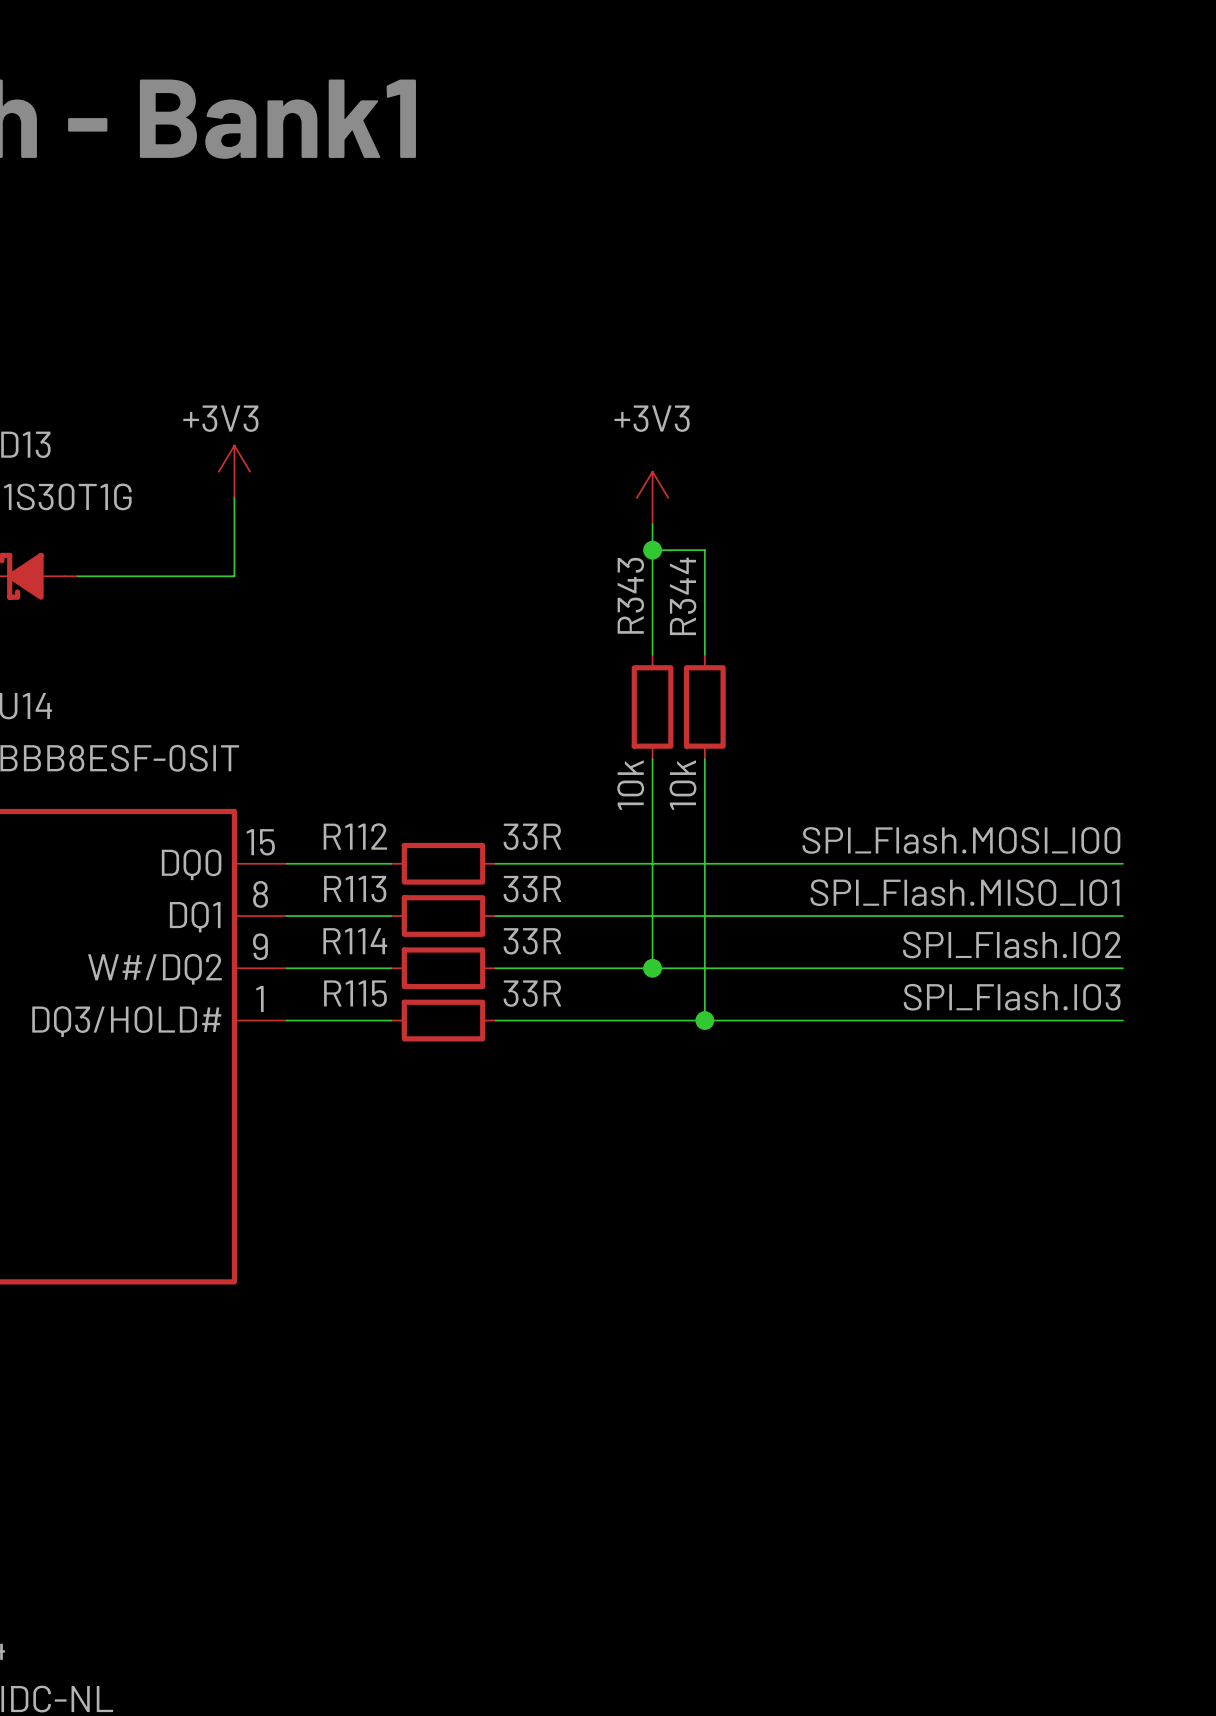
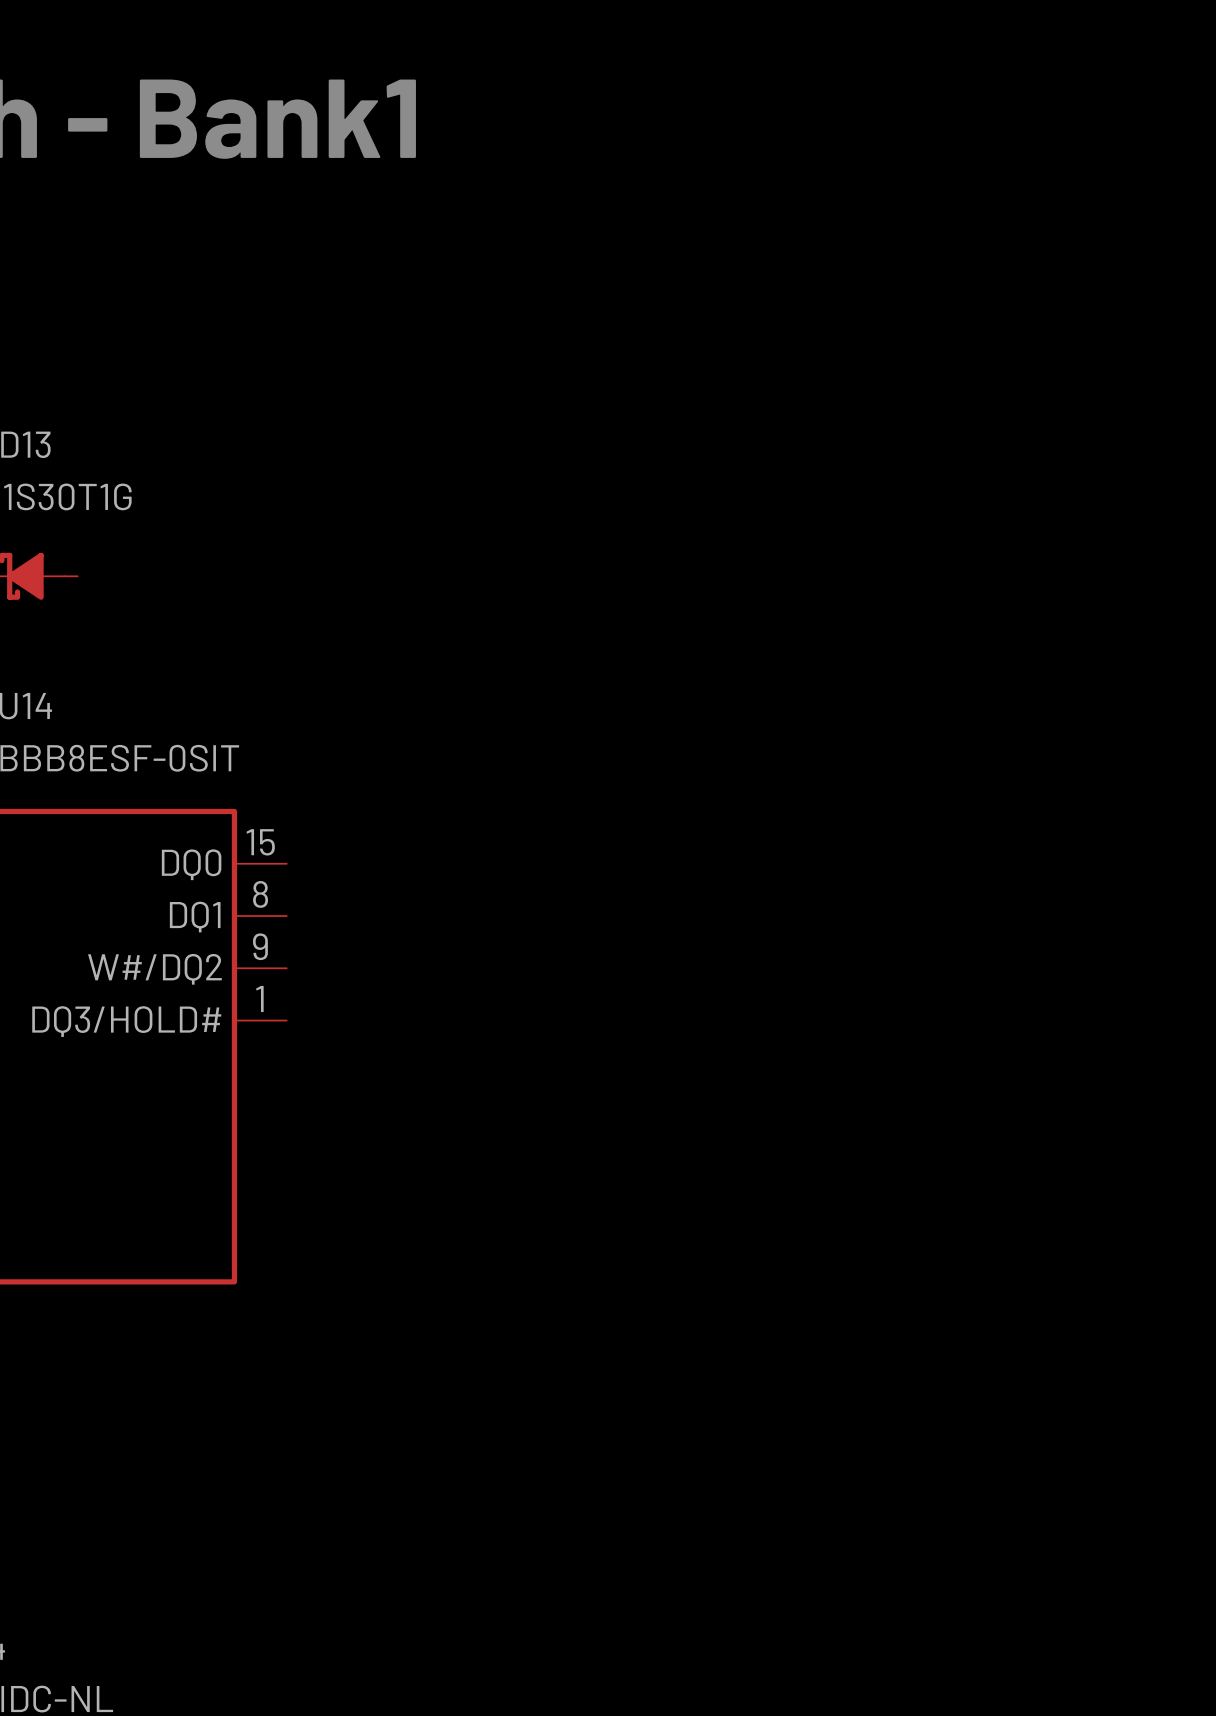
power symbol: +3V3 (234, 471) -> none
wire: (234, 497) (234, 576) (77, 576) -> none
power symbol: +3V3 (652, 497) -> none
wire: (652, 524) (652, 654) -> none
wire: (652, 550) (704, 550) (704, 654) -> none
junction: (652, 550) -> none
R343: (652, 706) -> none
R344: (704, 706) -> none
wire: (652, 759) (652, 968) -> none
wire: (704, 759) (704, 1020) -> none
label: SPI_Flash.MOSI_IO0 (961, 840) -> none
wire: (286, 863) (391, 863) -> none
R112: (443, 863) -> none
wire: (495, 863) (1122, 863) -> none
label: SPI_Flash.MISO_IO1 (965, 892) -> none
wire: (286, 916) (391, 916) -> none
R113: (443, 916) -> none
wire: (495, 916) (1122, 916) -> none
label: SPI_Flash.IO2 (1011, 944) -> none
wire: (286, 968) (391, 968) -> none
R114: (443, 968) -> none
wire: (495, 968) (1122, 968) -> none
junction: (652, 968) -> none
label: SPI_Flash.IO3 (1012, 997) -> none
wire: (286, 1020) (391, 1020) -> none
R115: (443, 1020) -> none
wire: (495, 1020) (1122, 1020) -> none
junction: (704, 1020) -> none

